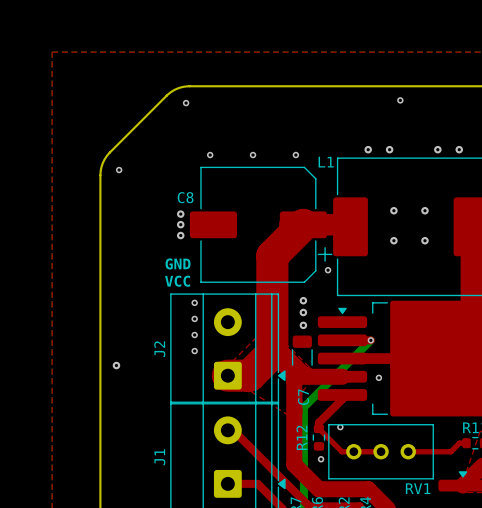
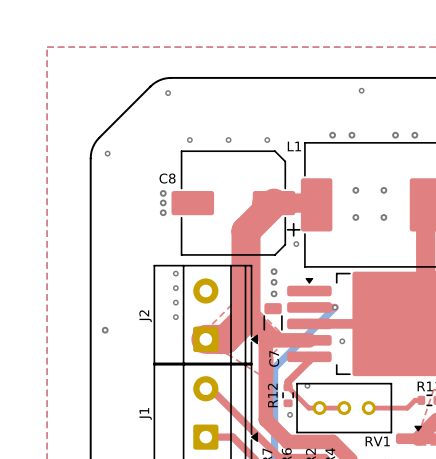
text: GND (178, 263) -> none
text: VCC (177, 281) -> none

